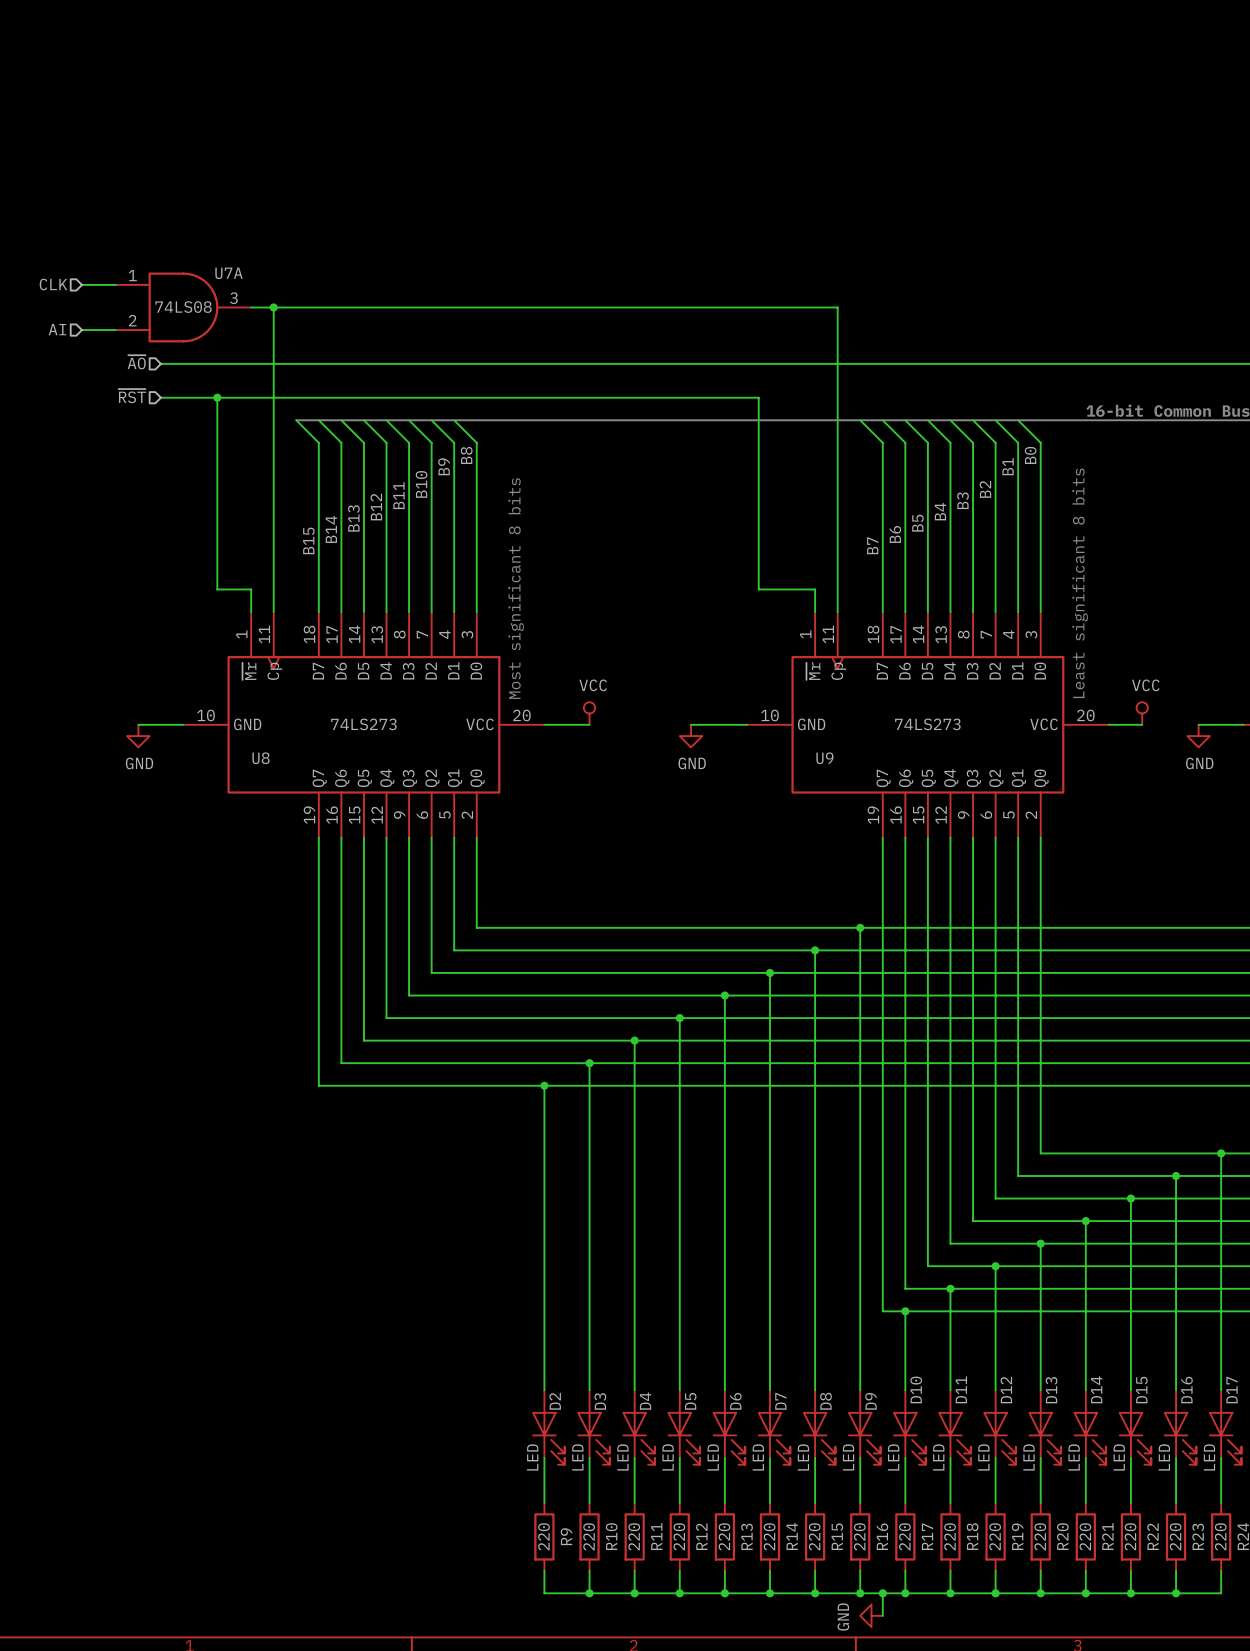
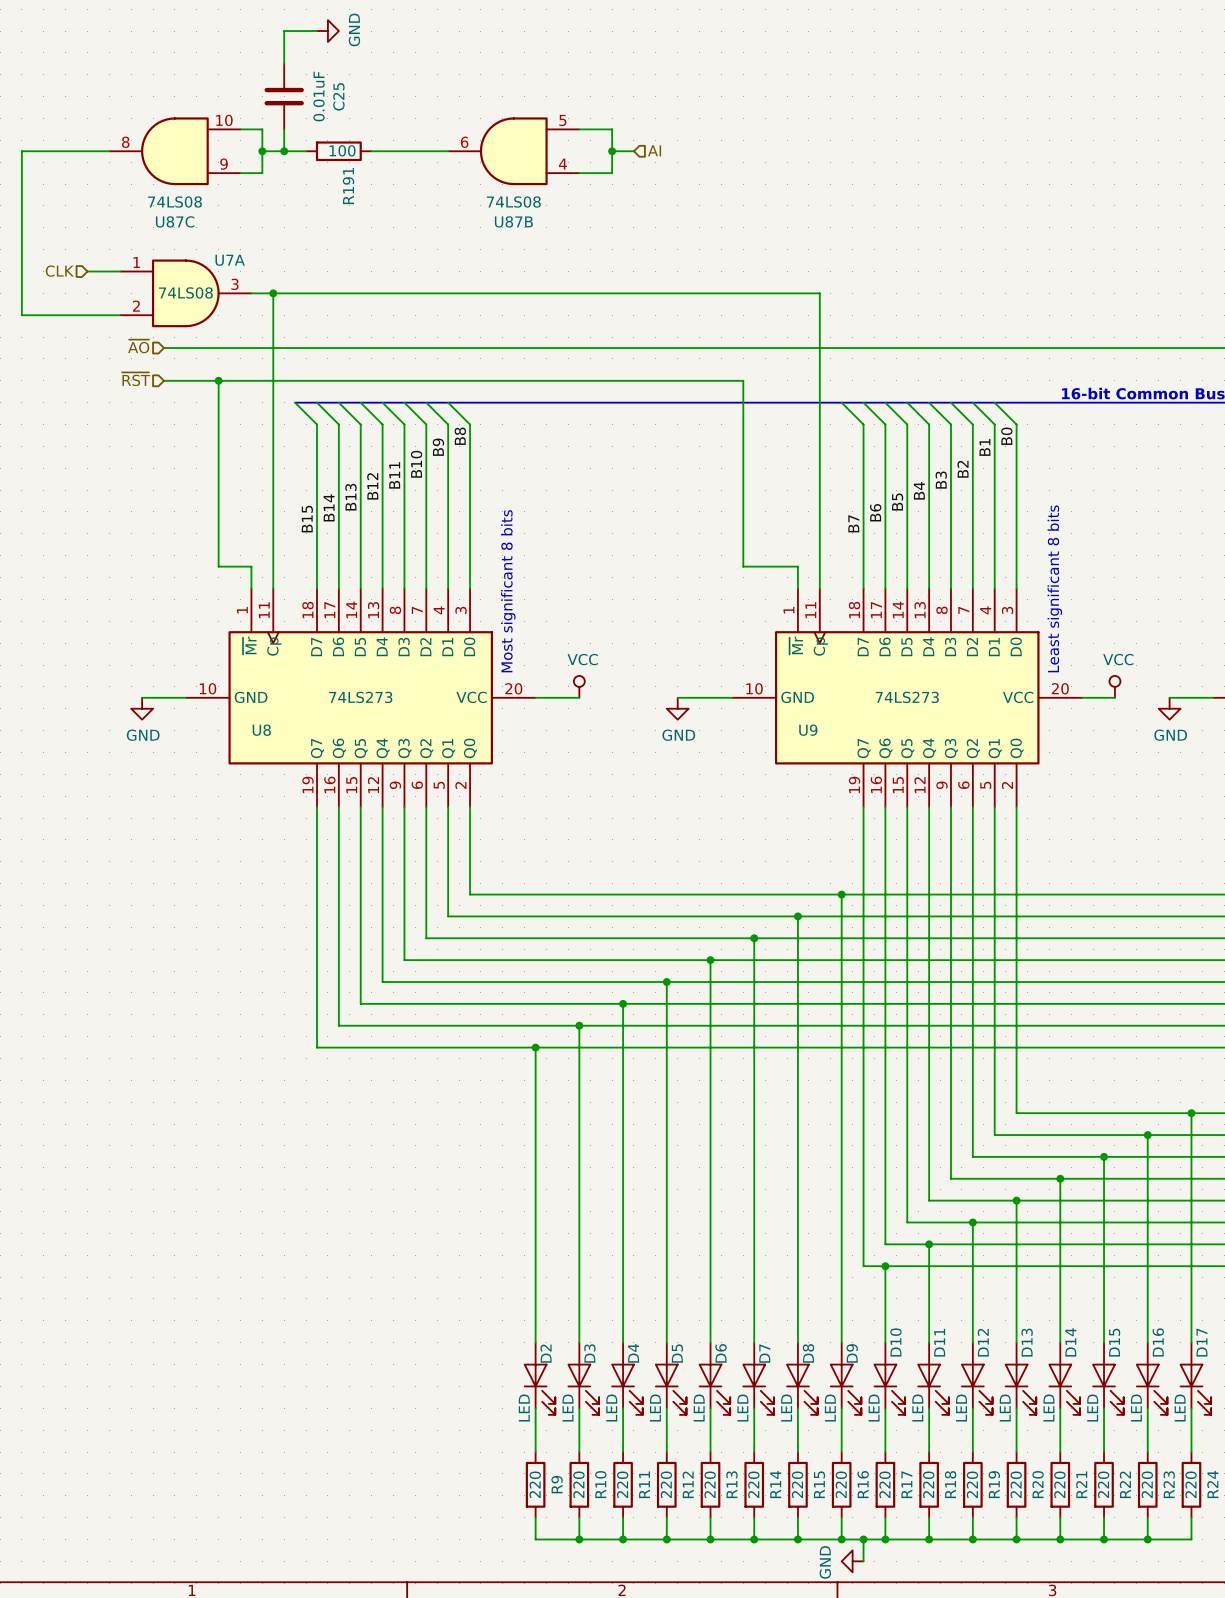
wire: none -> (317, 31) (284, 31) (284, 63)
power symbol: none -> GND (327, 31)
C25: none -> 0.01uF (284, 96)
wire: none -> (240, 129) (262, 129) (262, 173) (240, 173)
wire: none -> (284, 129) (284, 151)
wire: none -> (579, 129) (612, 129) (612, 173) (579, 173)
wire: none -> (109, 151) (21, 151) (21, 315) (87, 315)
U87C: none -> 74LS08 (174, 151)
wire: none -> (262, 151) (306, 151)
junction: none -> (262, 151)
junction: none -> (284, 151)
R191: none -> 100 (338, 151)
wire: none -> (371, 151) (448, 151)
U87B: none -> 74LS08 (513, 151)
wire: none -> (612, 151) (633, 151)
junction: none -> (612, 151)
hierarchical label: none -> AI (654, 150)
hierarchical label: AI (57, 329) -> none

